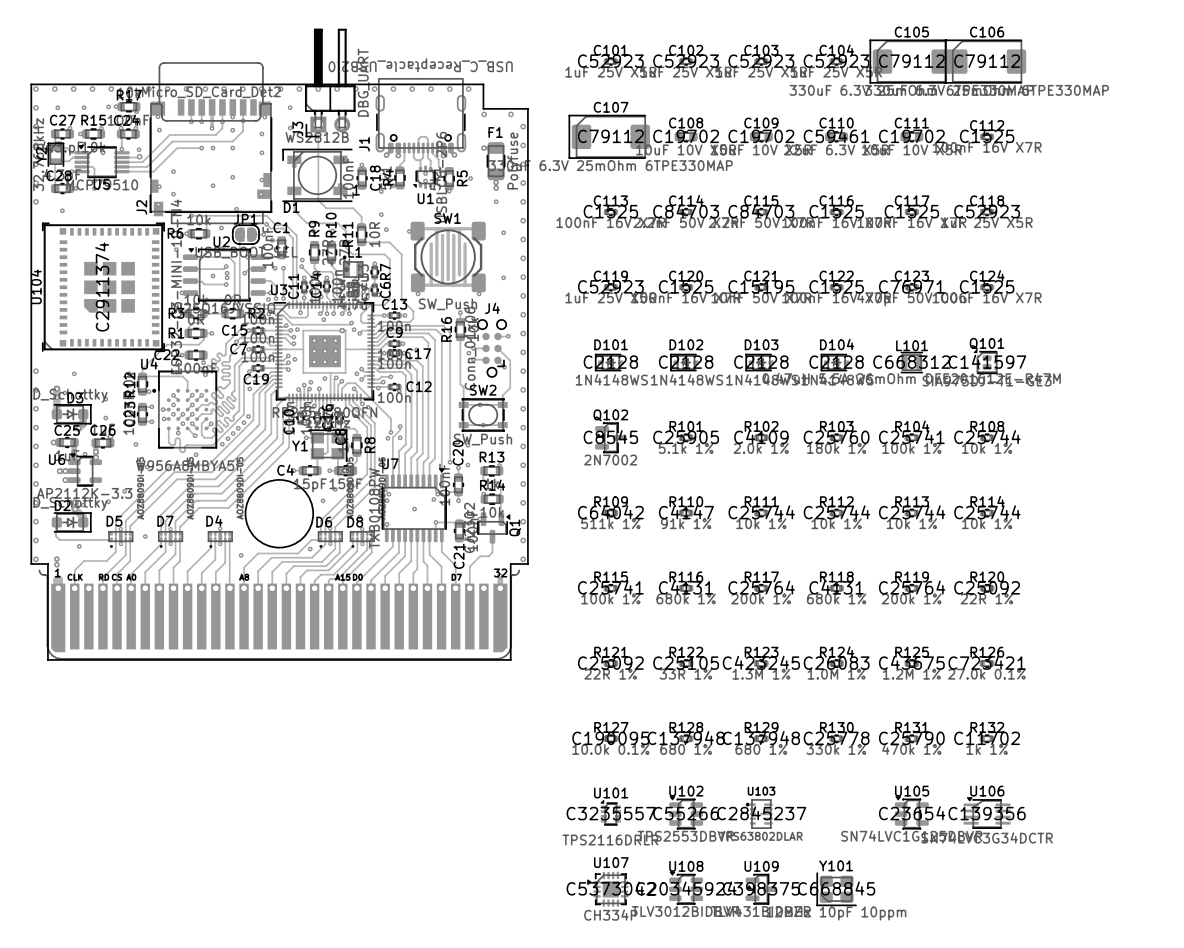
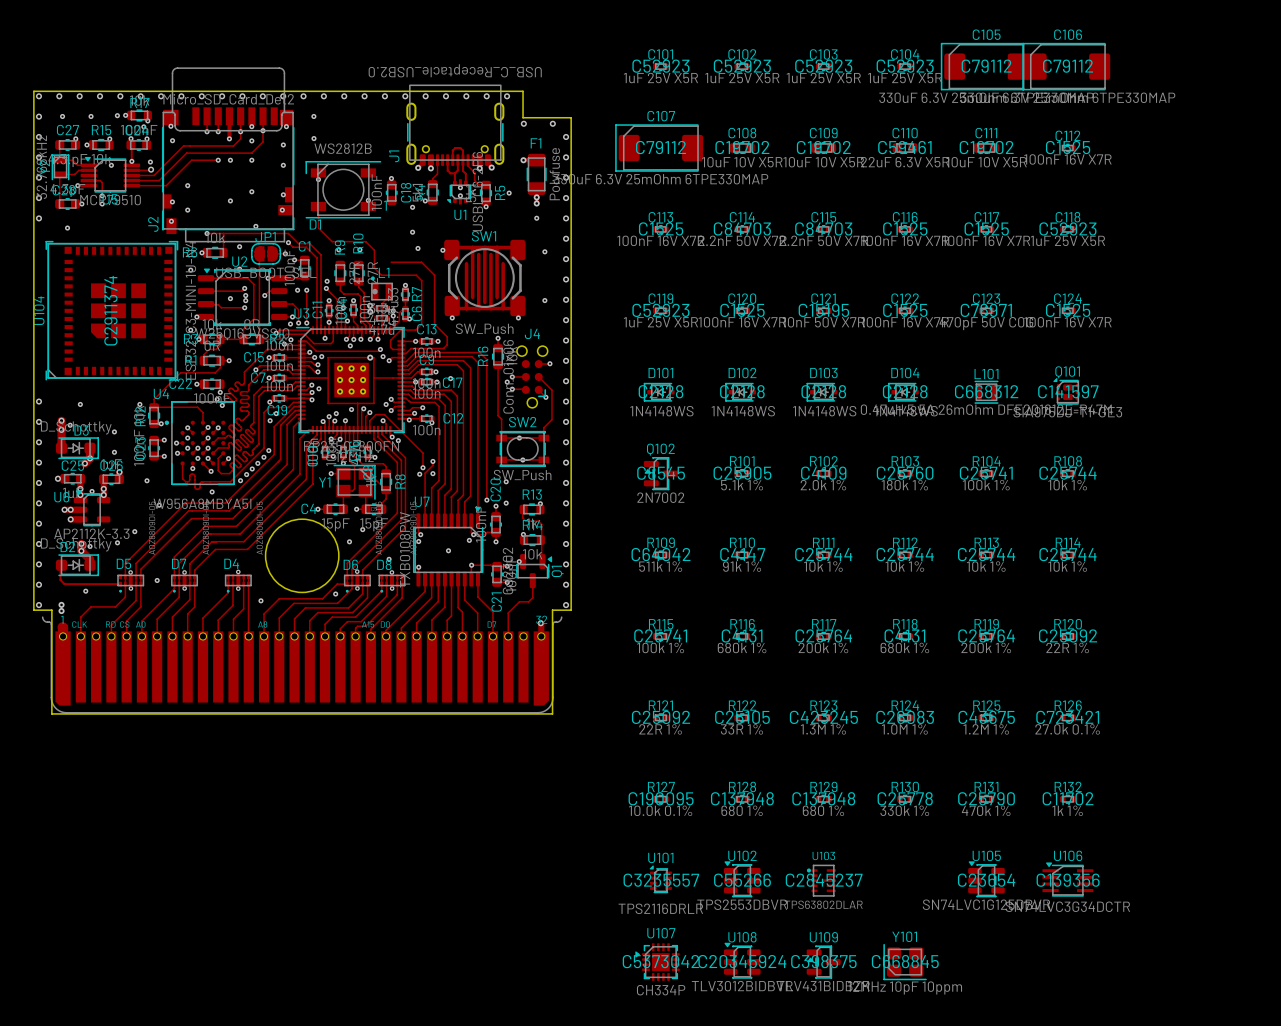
J3: DBG_UART (330, 83) -> none
track: (318, 124) (318, 200) (326, 208) (353, 208) (361, 216) (361, 226) -> none
R11: 10R (361, 234) -> none

